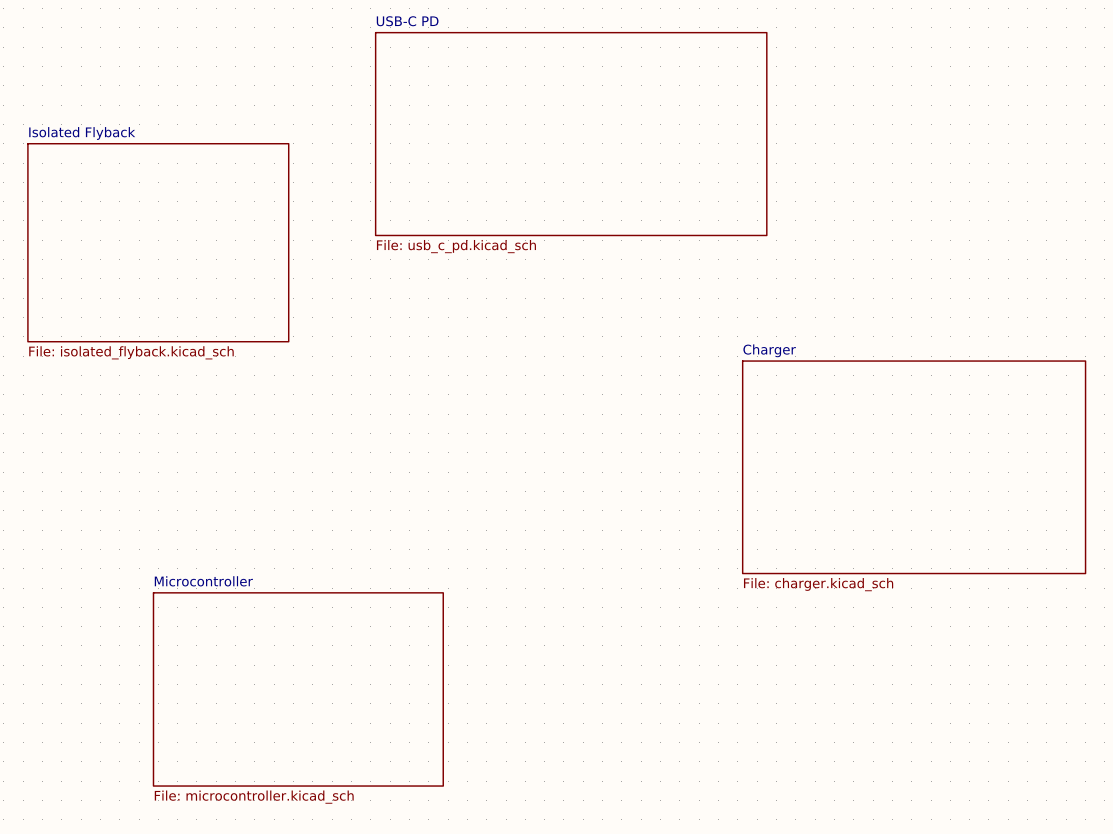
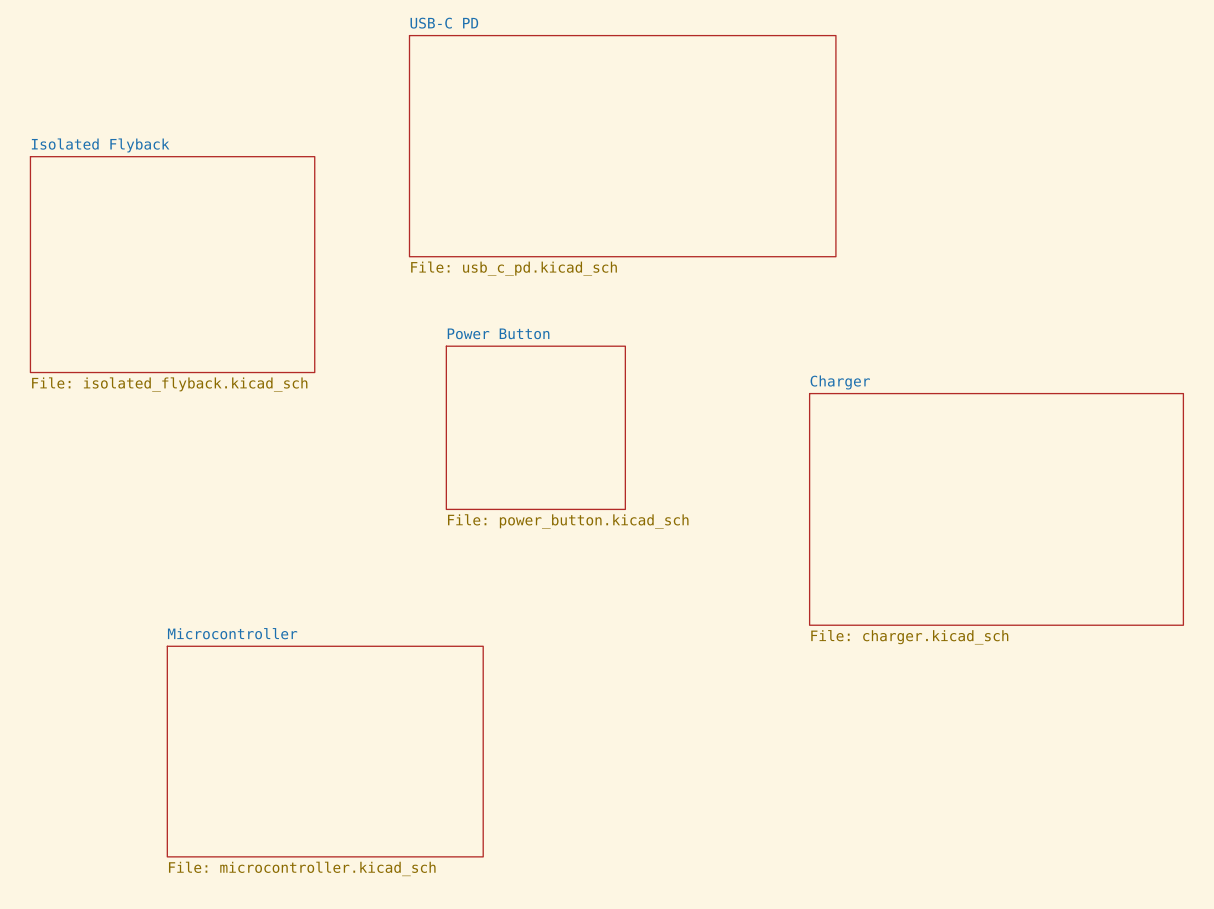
sheet Power Button: none -> File: power_button.kicad_sch (535, 427)

